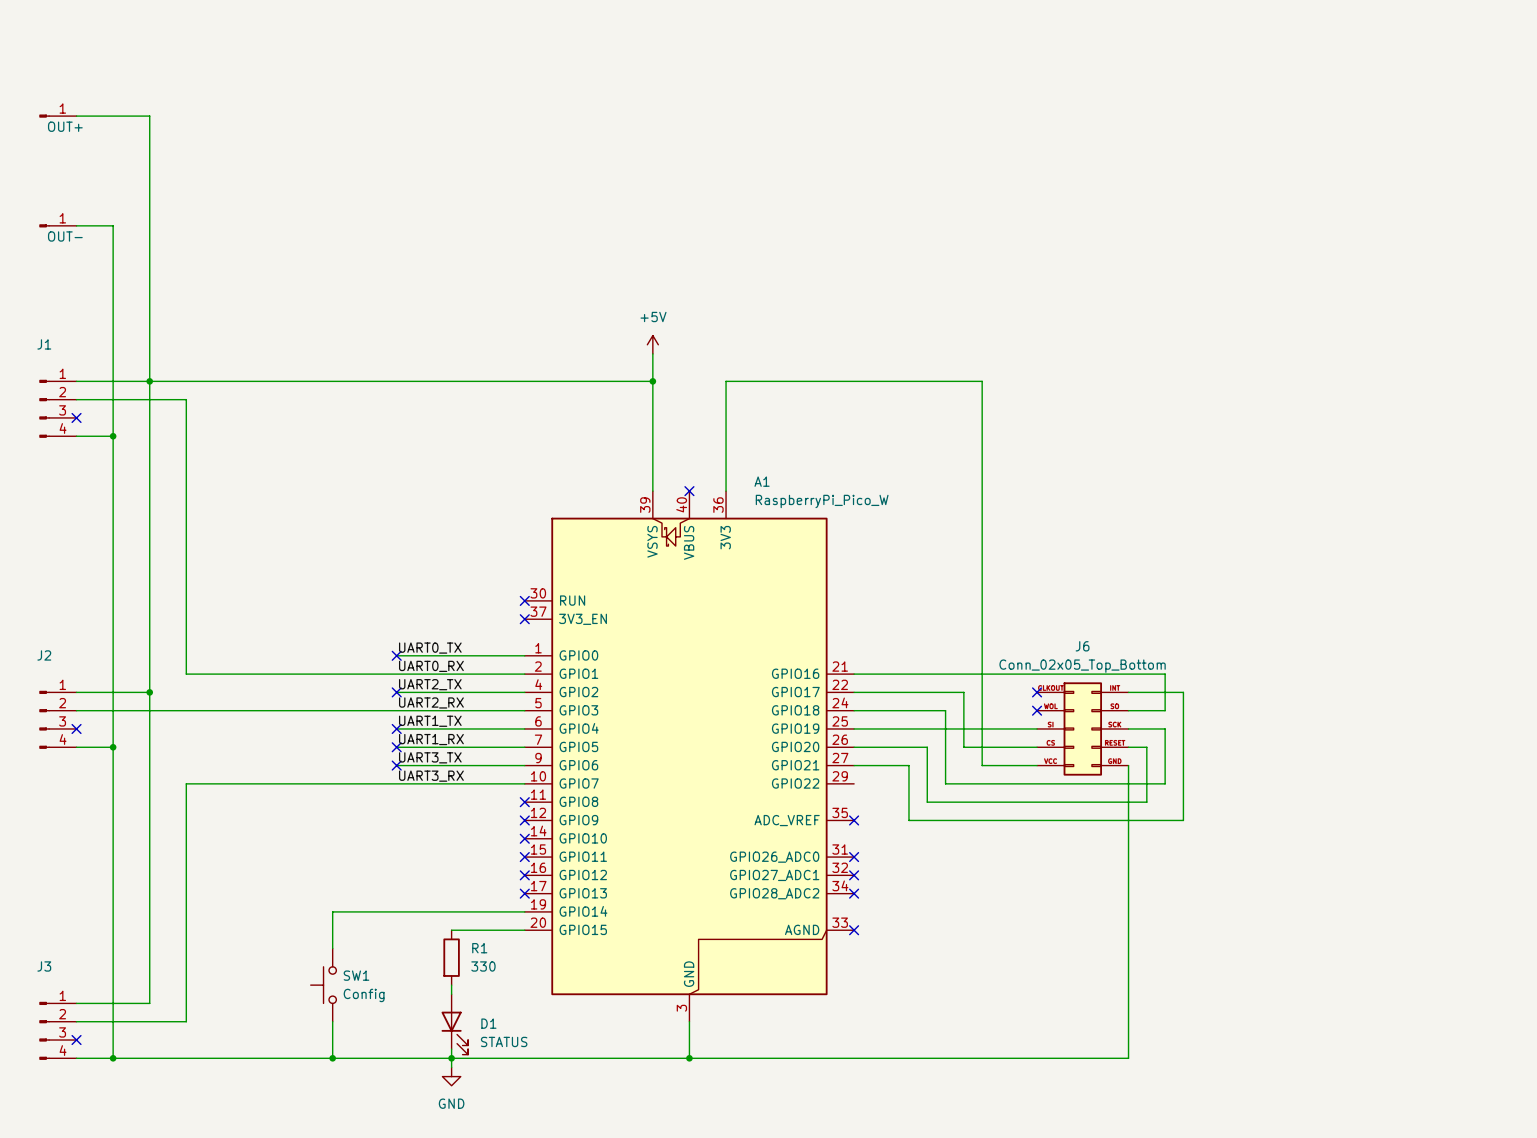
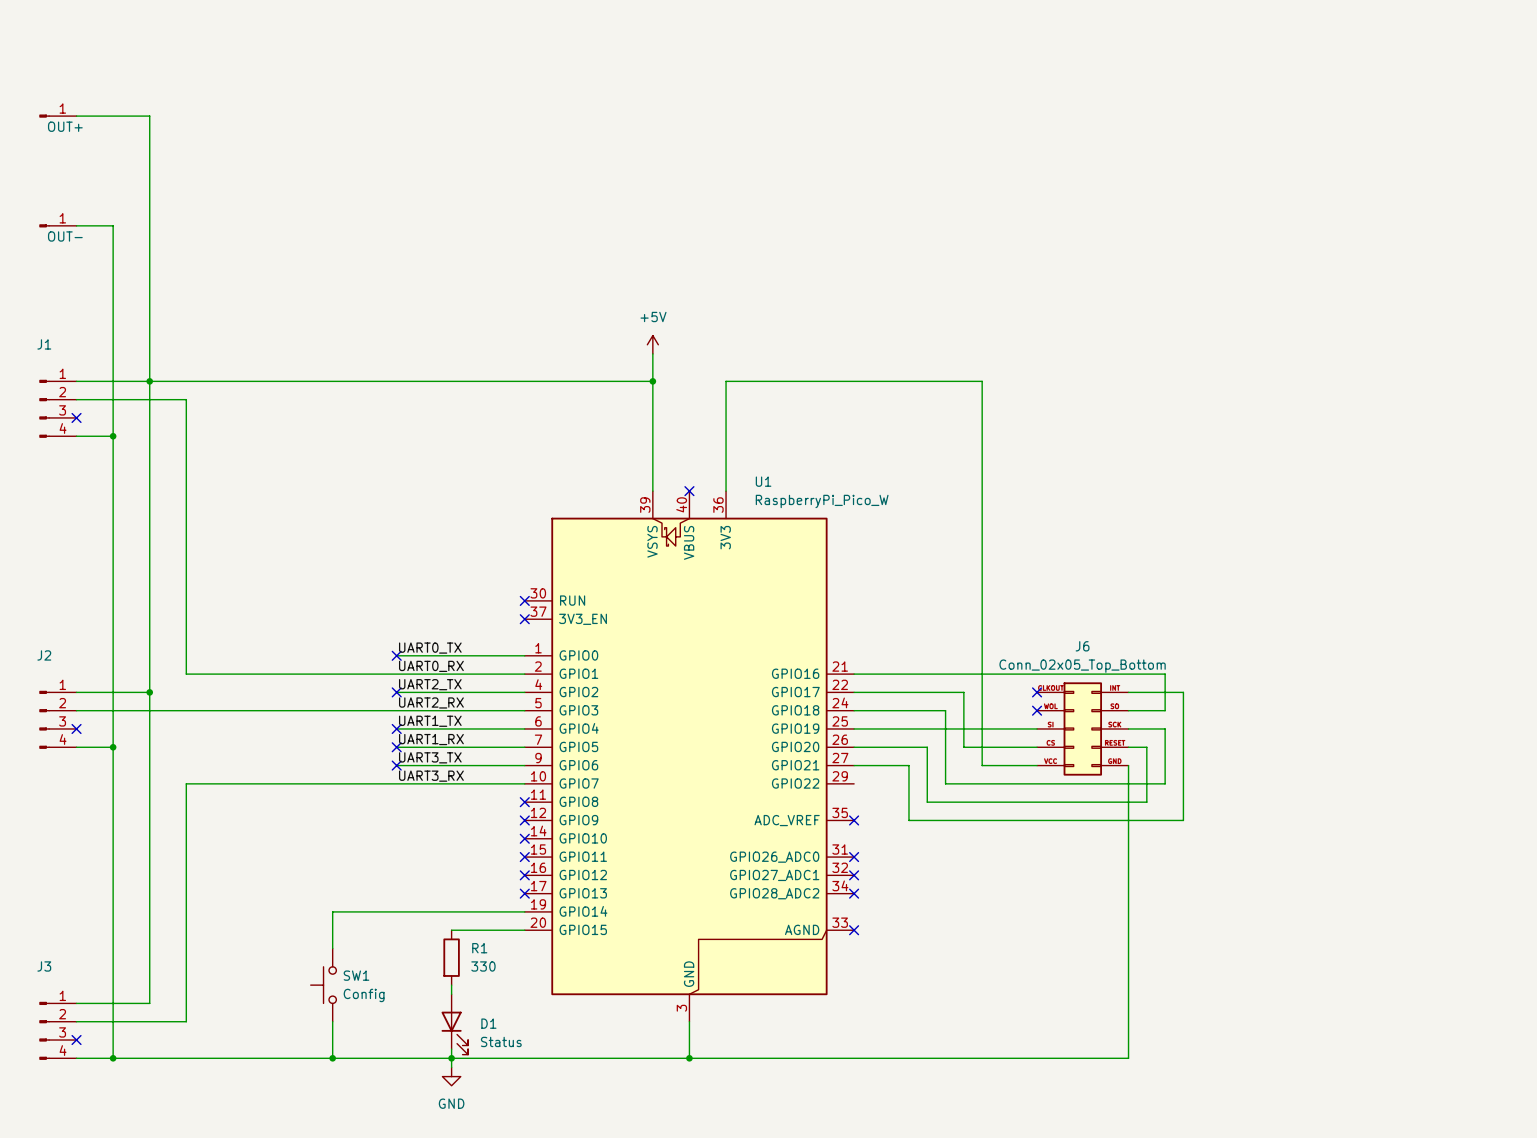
A1 name: A1 (762, 481) -> U1 (763, 481)
D1 value: STATUS (504, 1041) -> Status (501, 1041)

